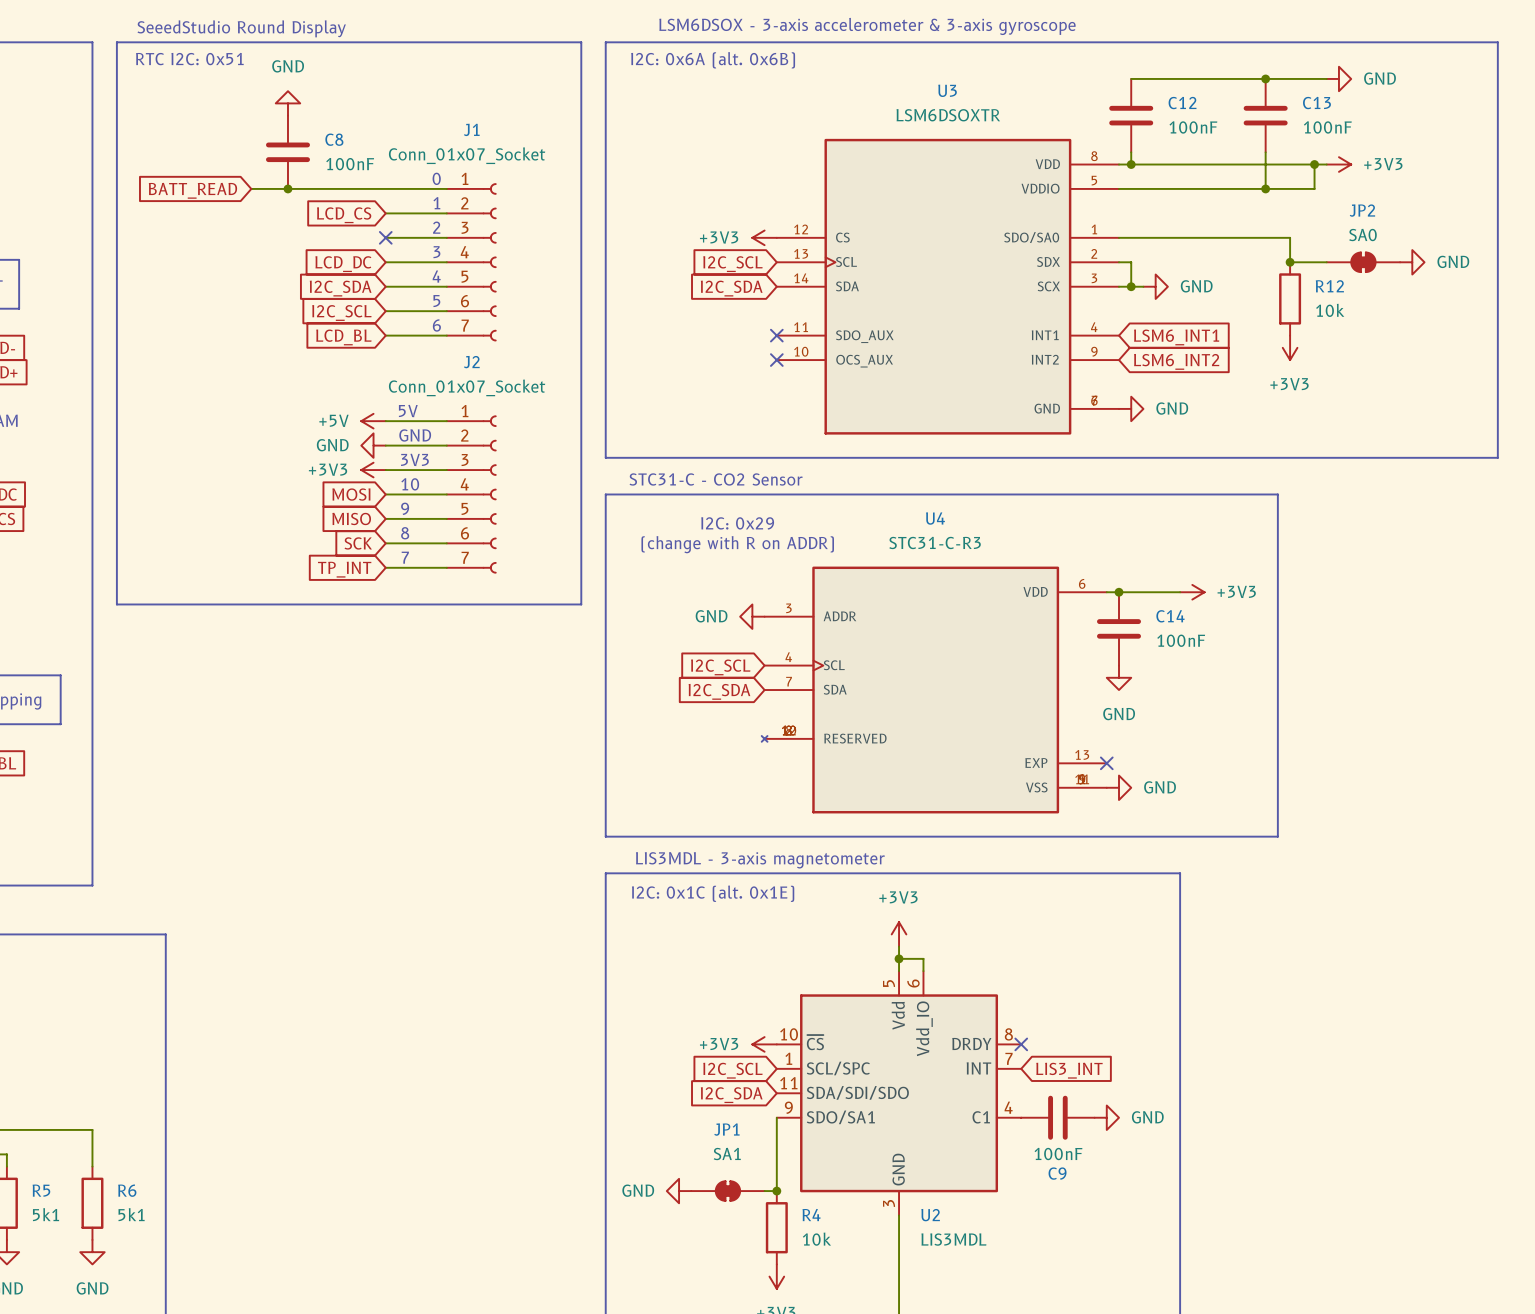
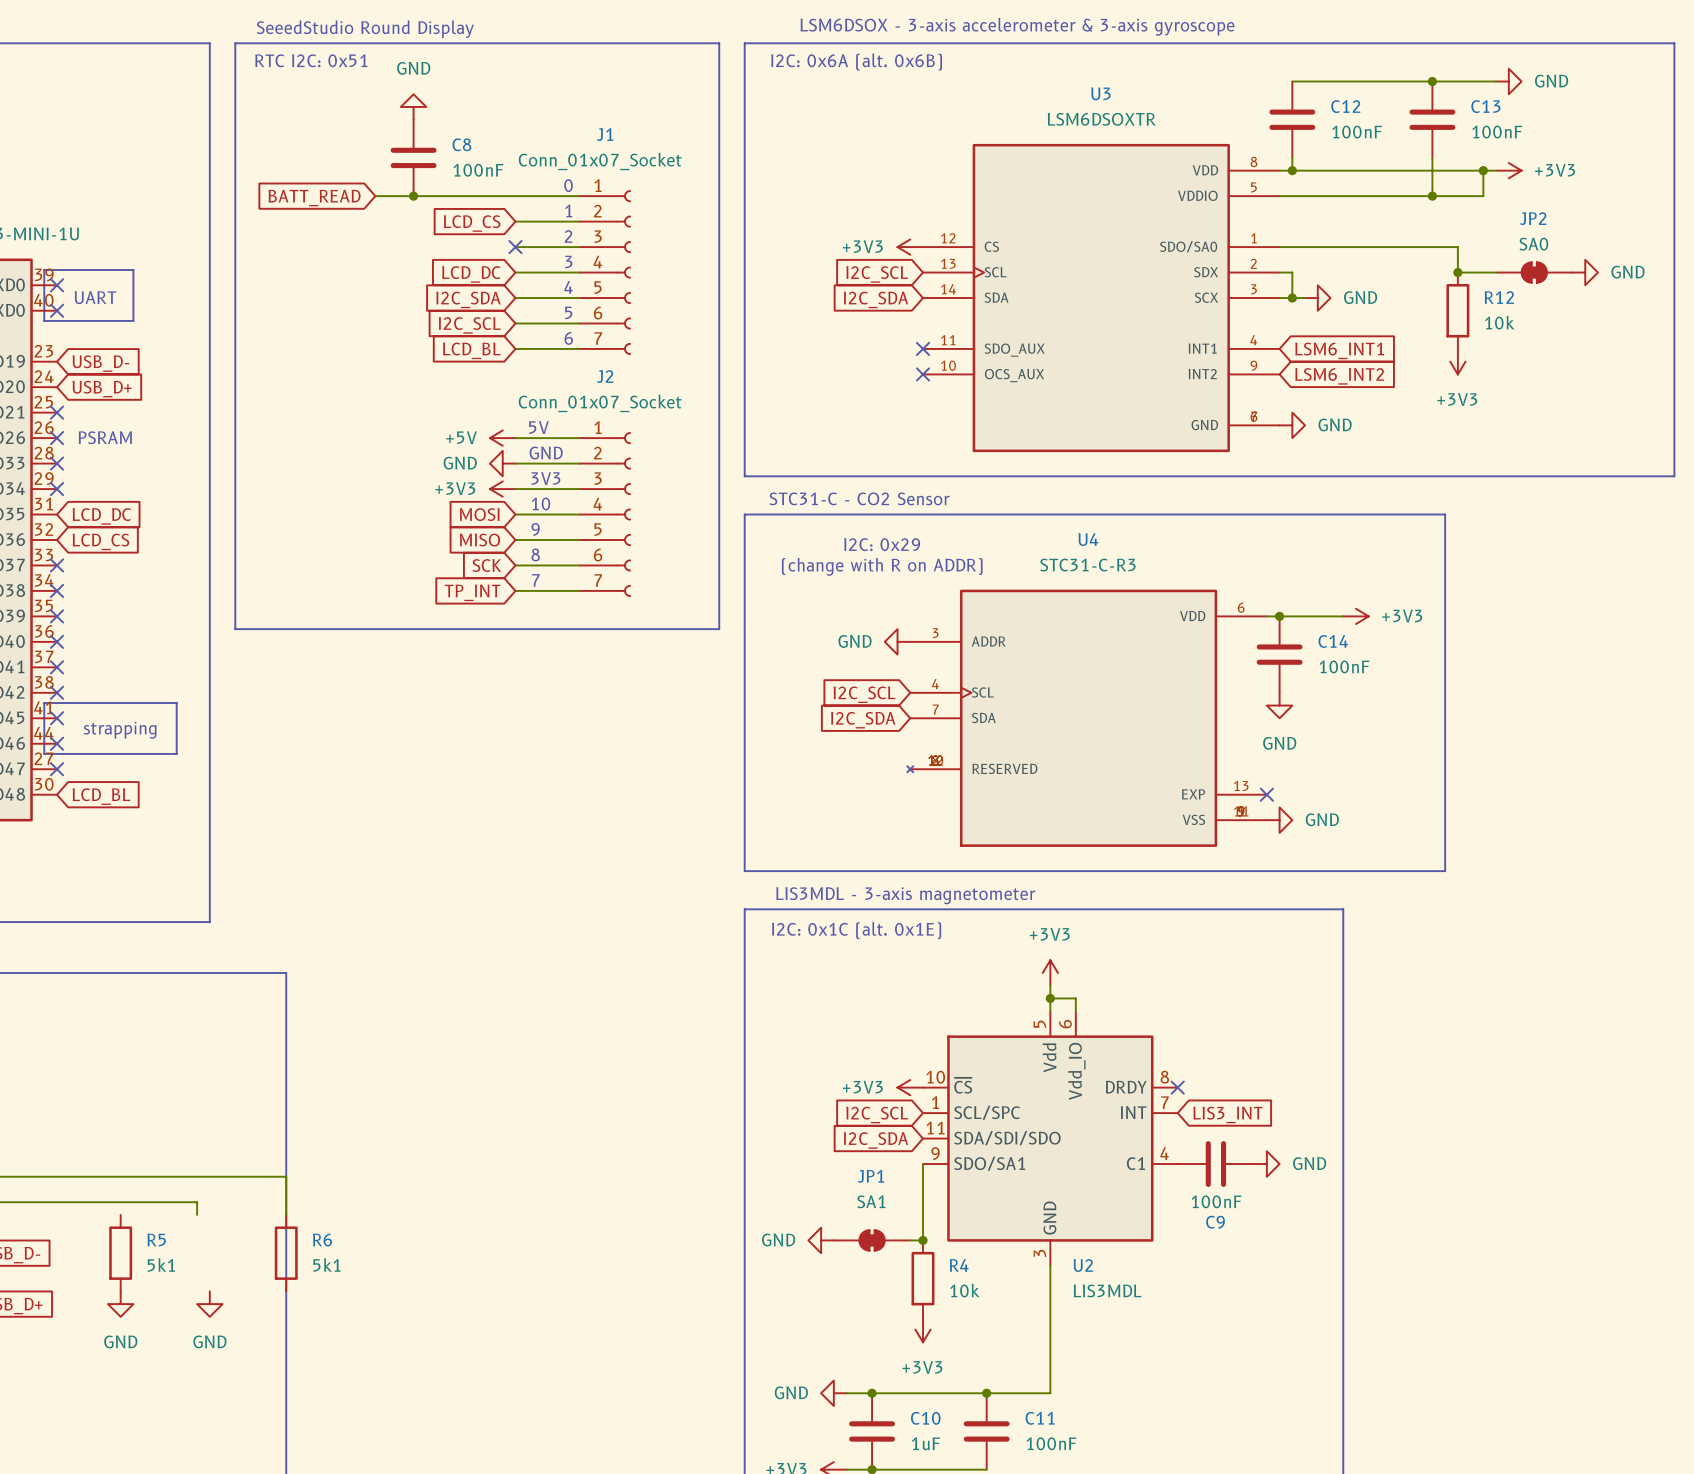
wire: (92, 1129) (92, 1166) -> (209, 1176) (286, 1176) (286, 1214)
wire: (6, 1154) (6, 1166) -> (120, 1202) (197, 1202) (197, 1214)
R6 position: (92, 1203) -> (286, 1253)

